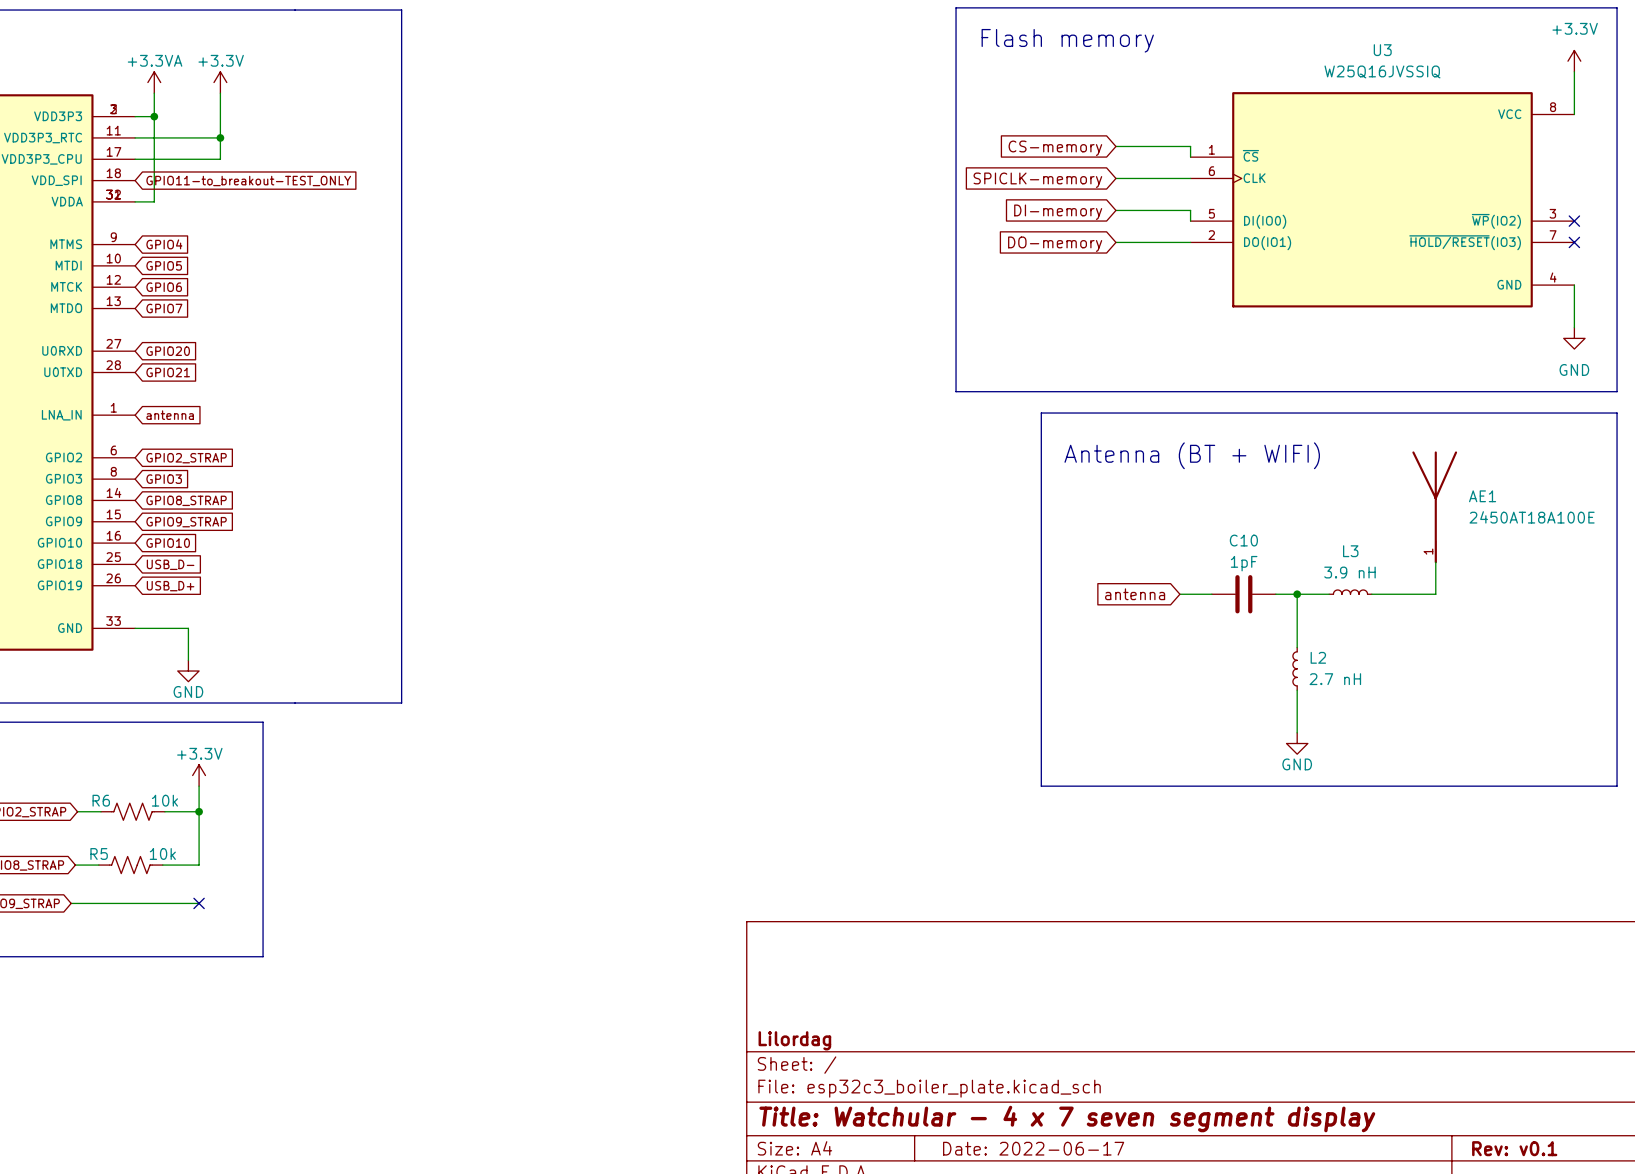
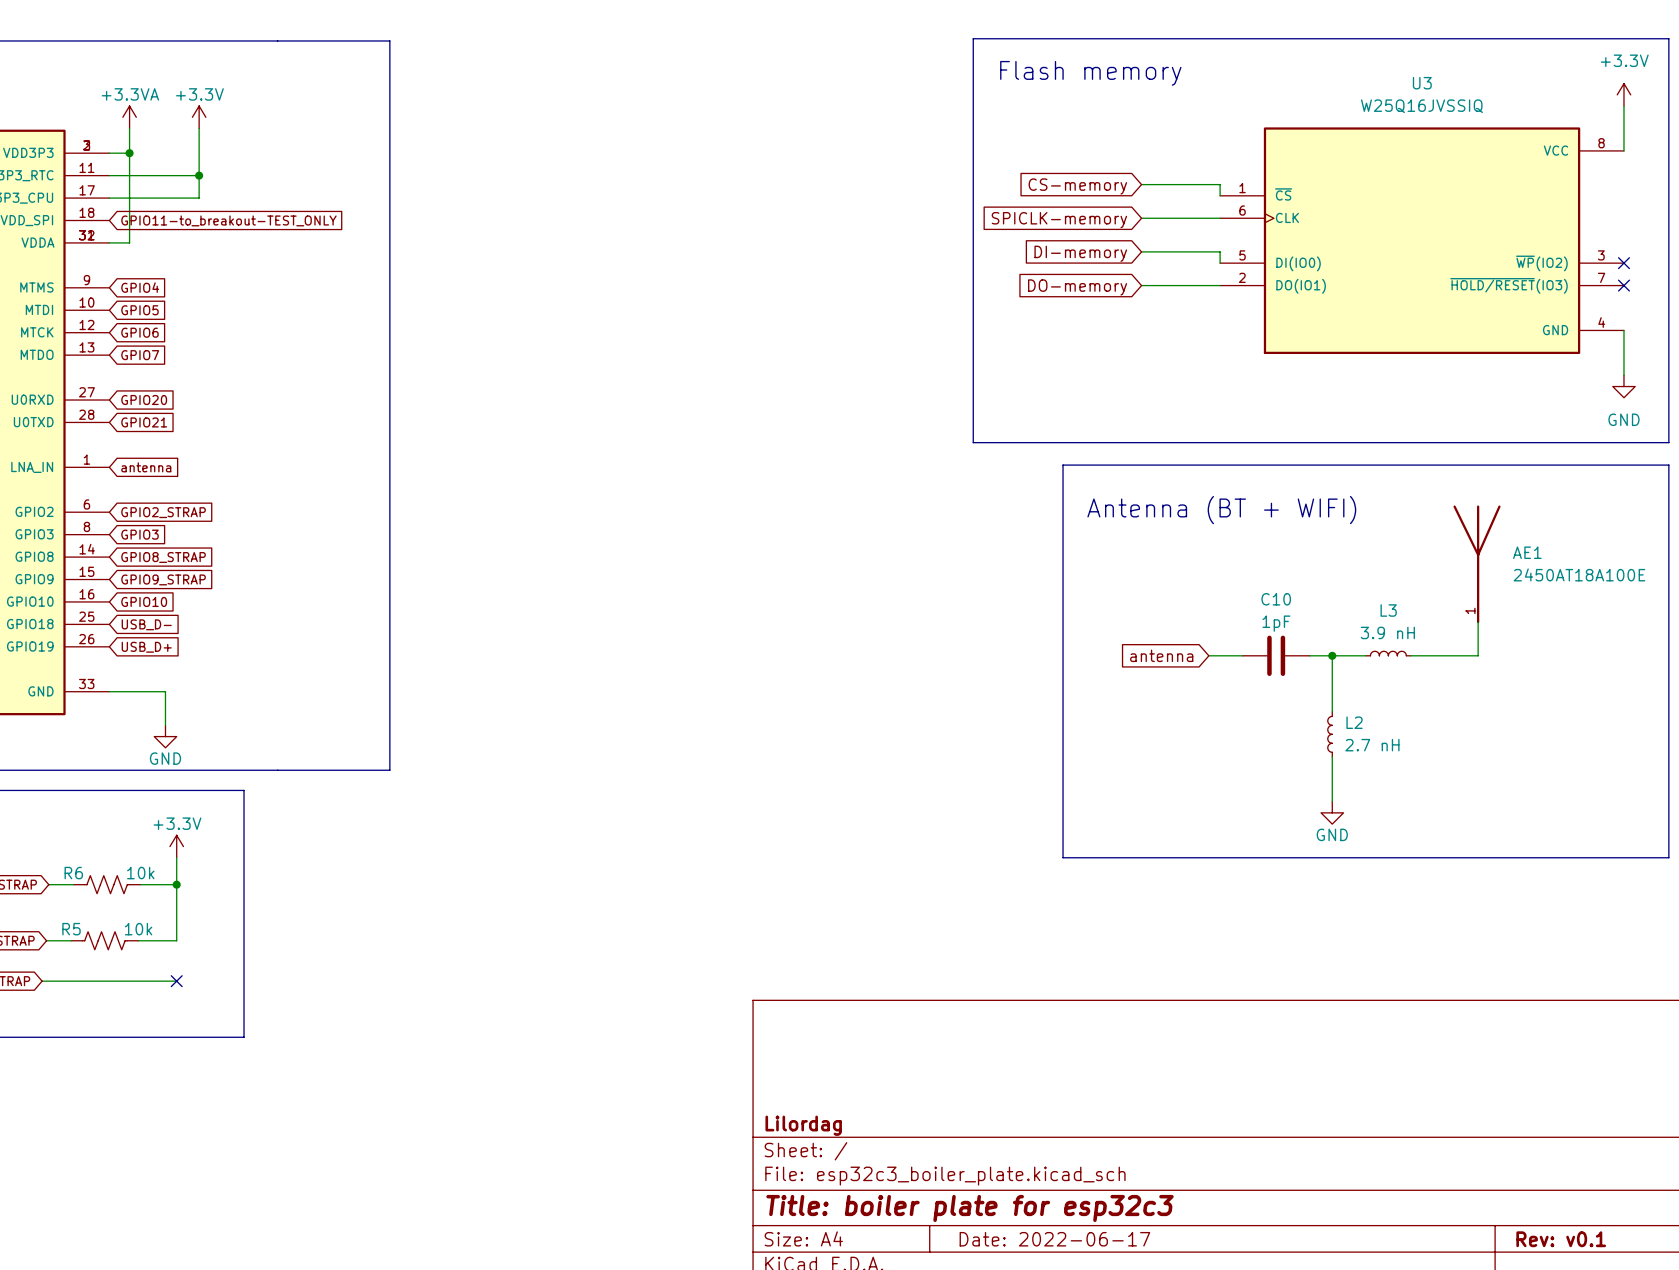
title block: Title: Watchular - 4 x 7 seven segment display (1067, 1119) -> Title: boiler plate for esp32c3 (970, 1208)

